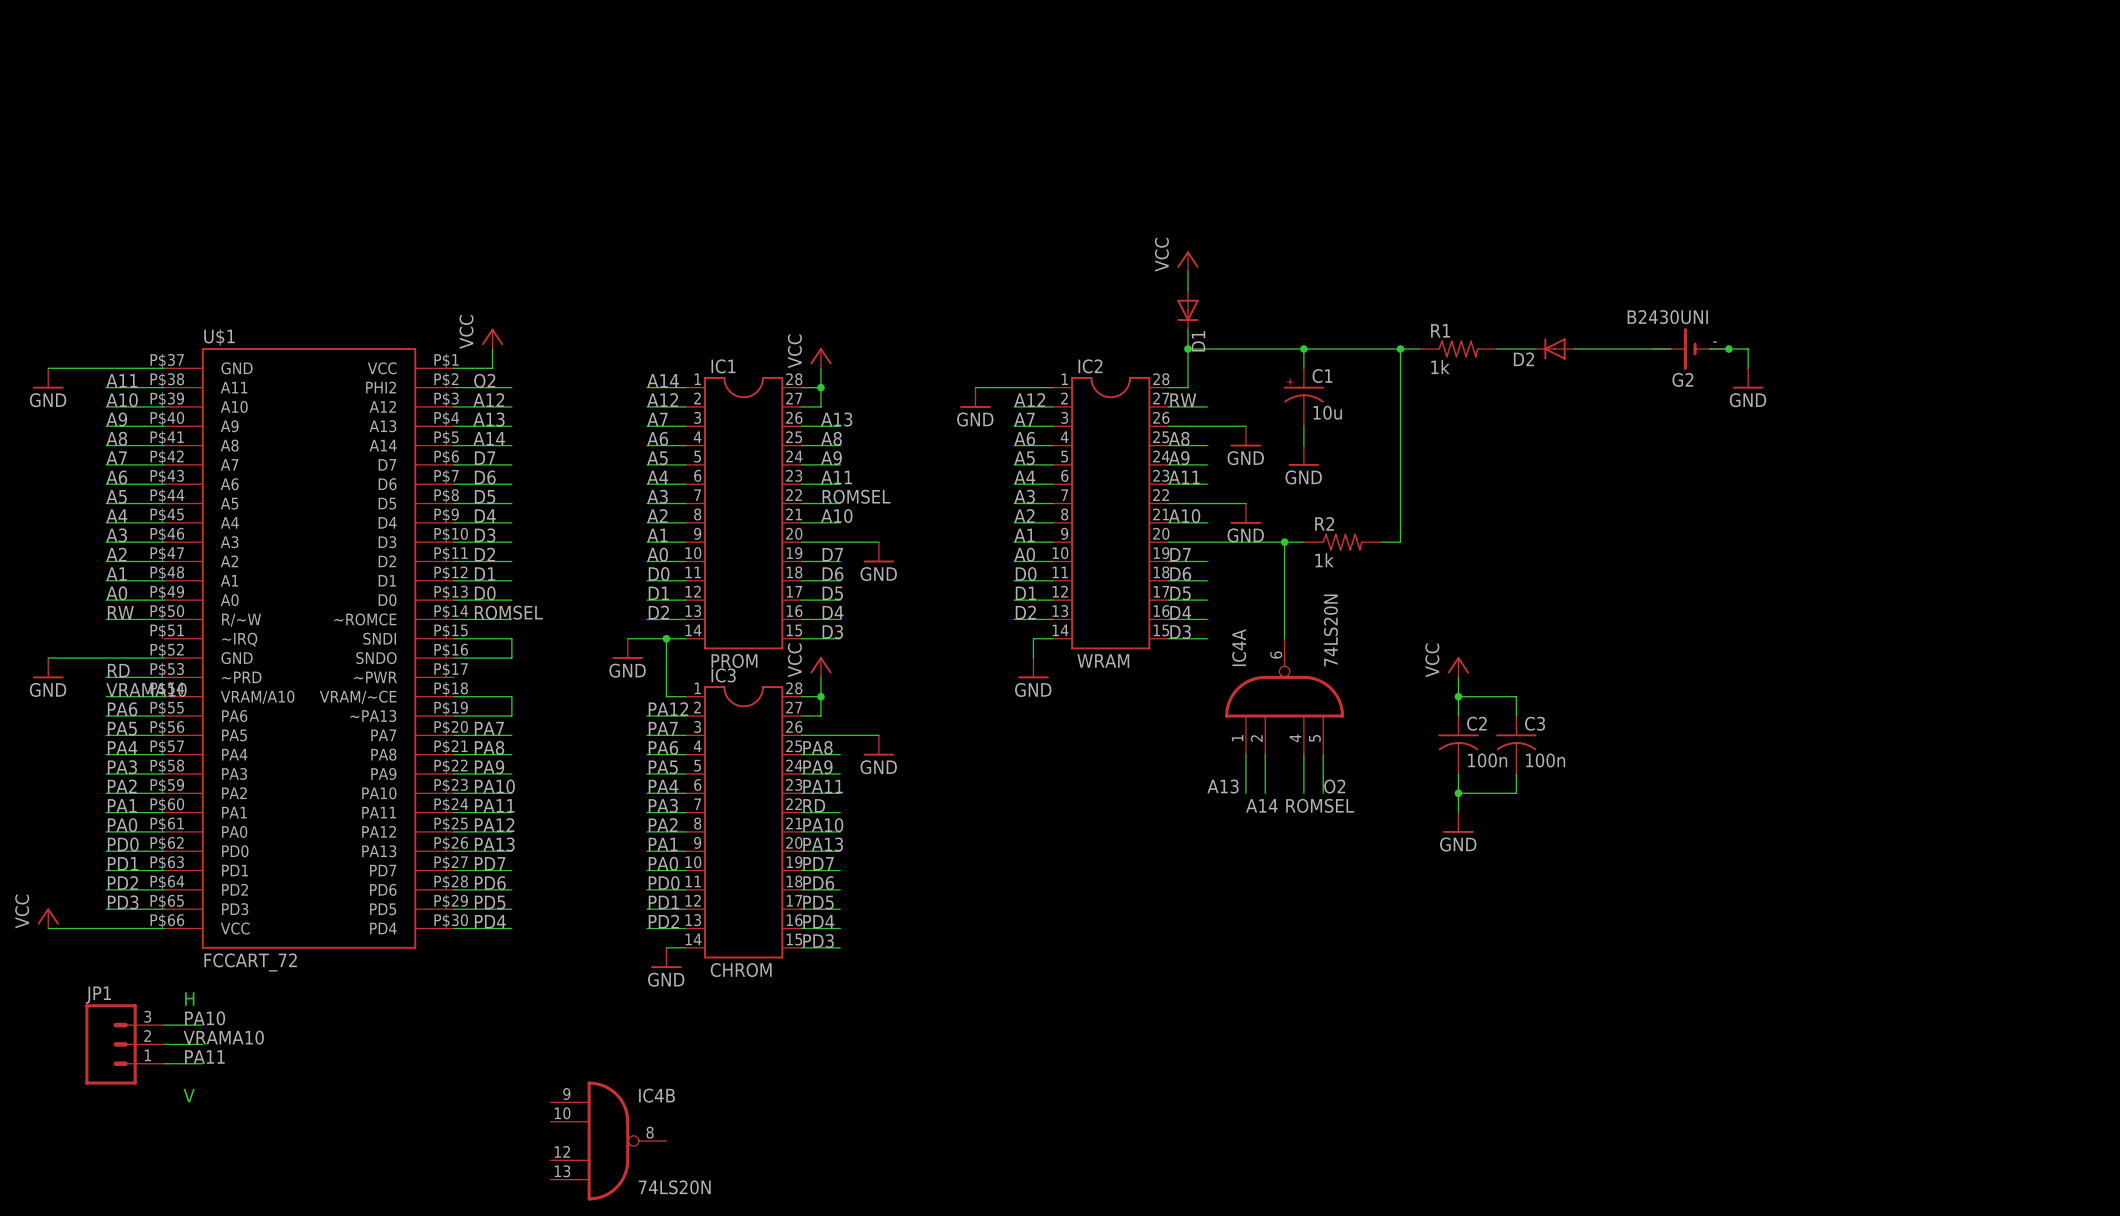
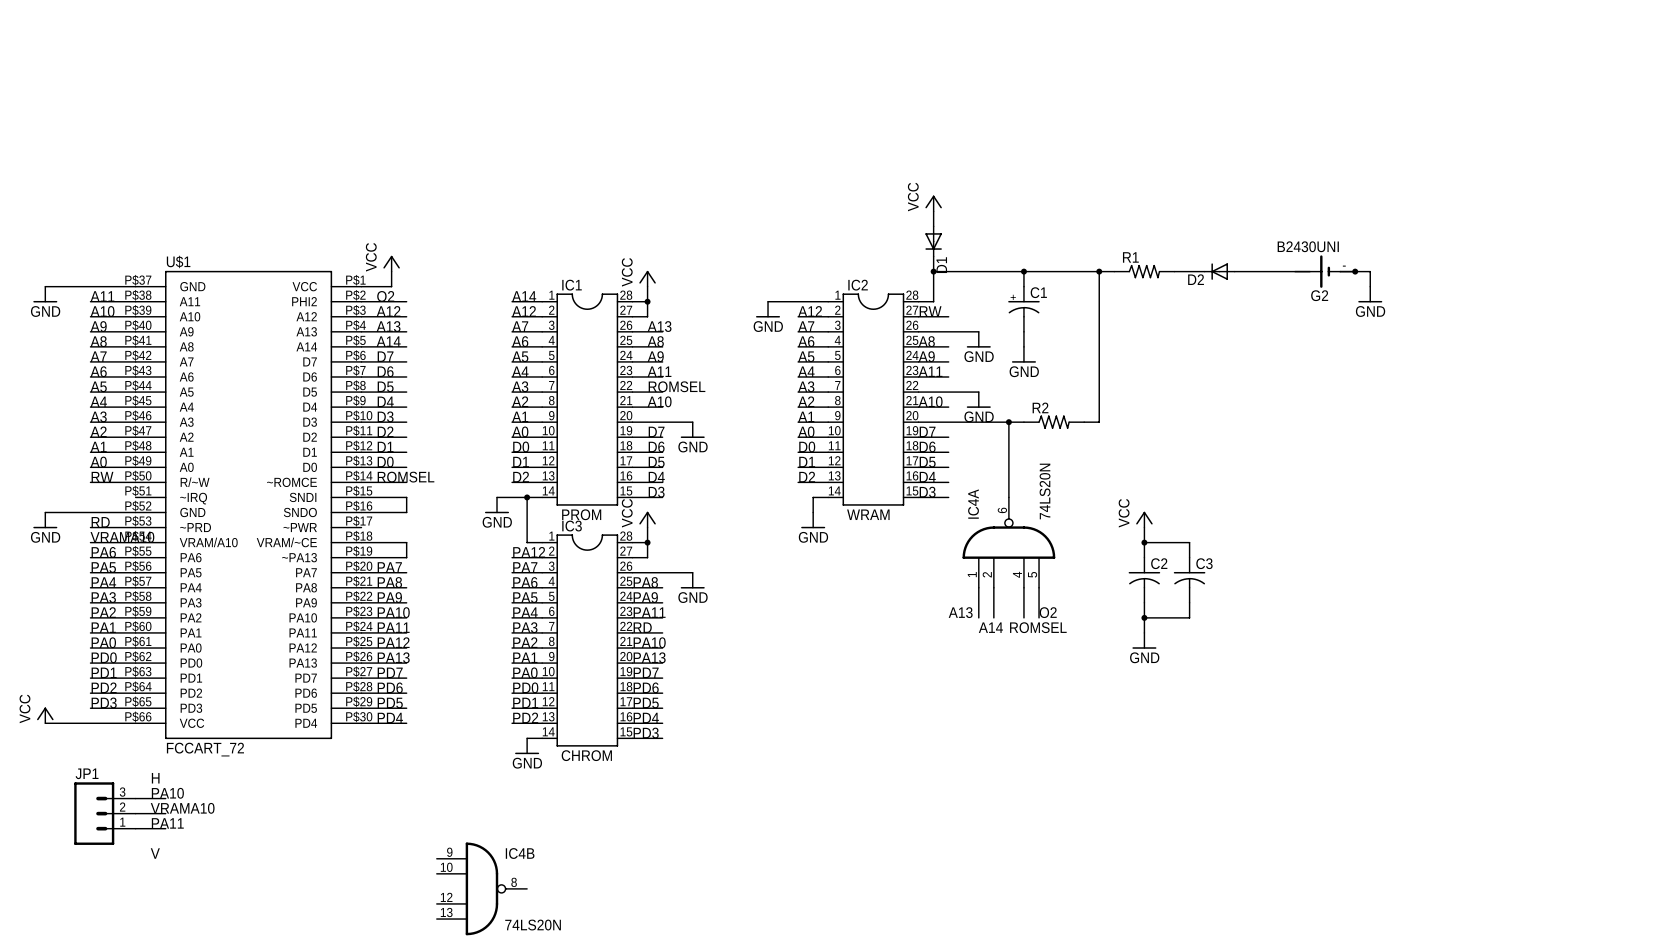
R1 value: 1k (1440, 367) -> none
C1 value: 10u (1327, 412) -> none
R2 value: 1k (1324, 560) -> none
C2 value: 100n (1487, 760) -> none
C3 value: 100n (1545, 760) -> none

